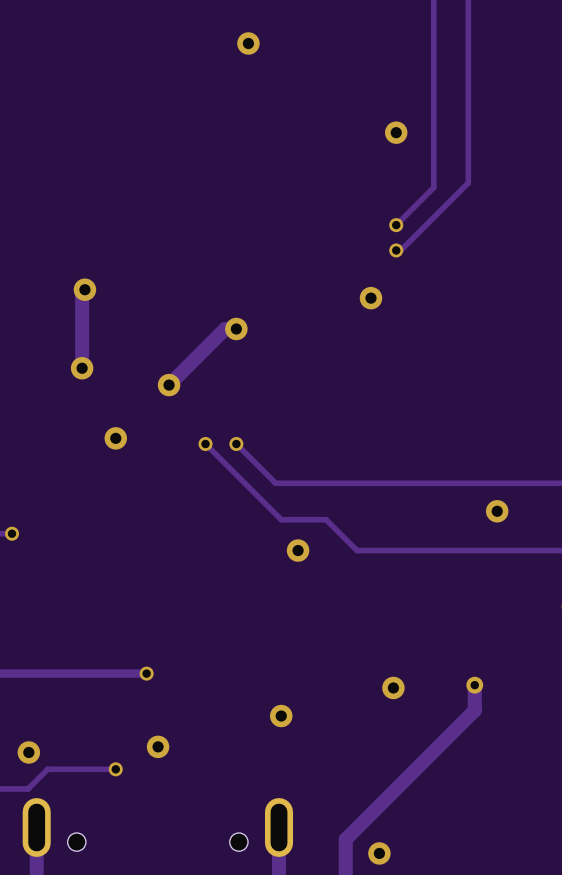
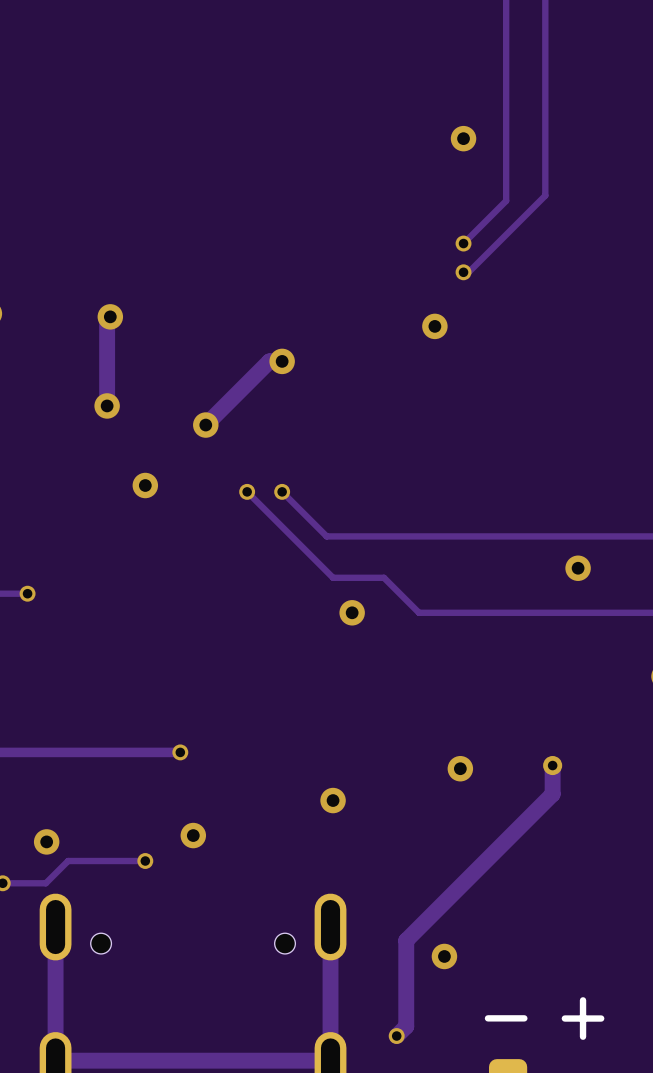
via: (248, 43) -> none

